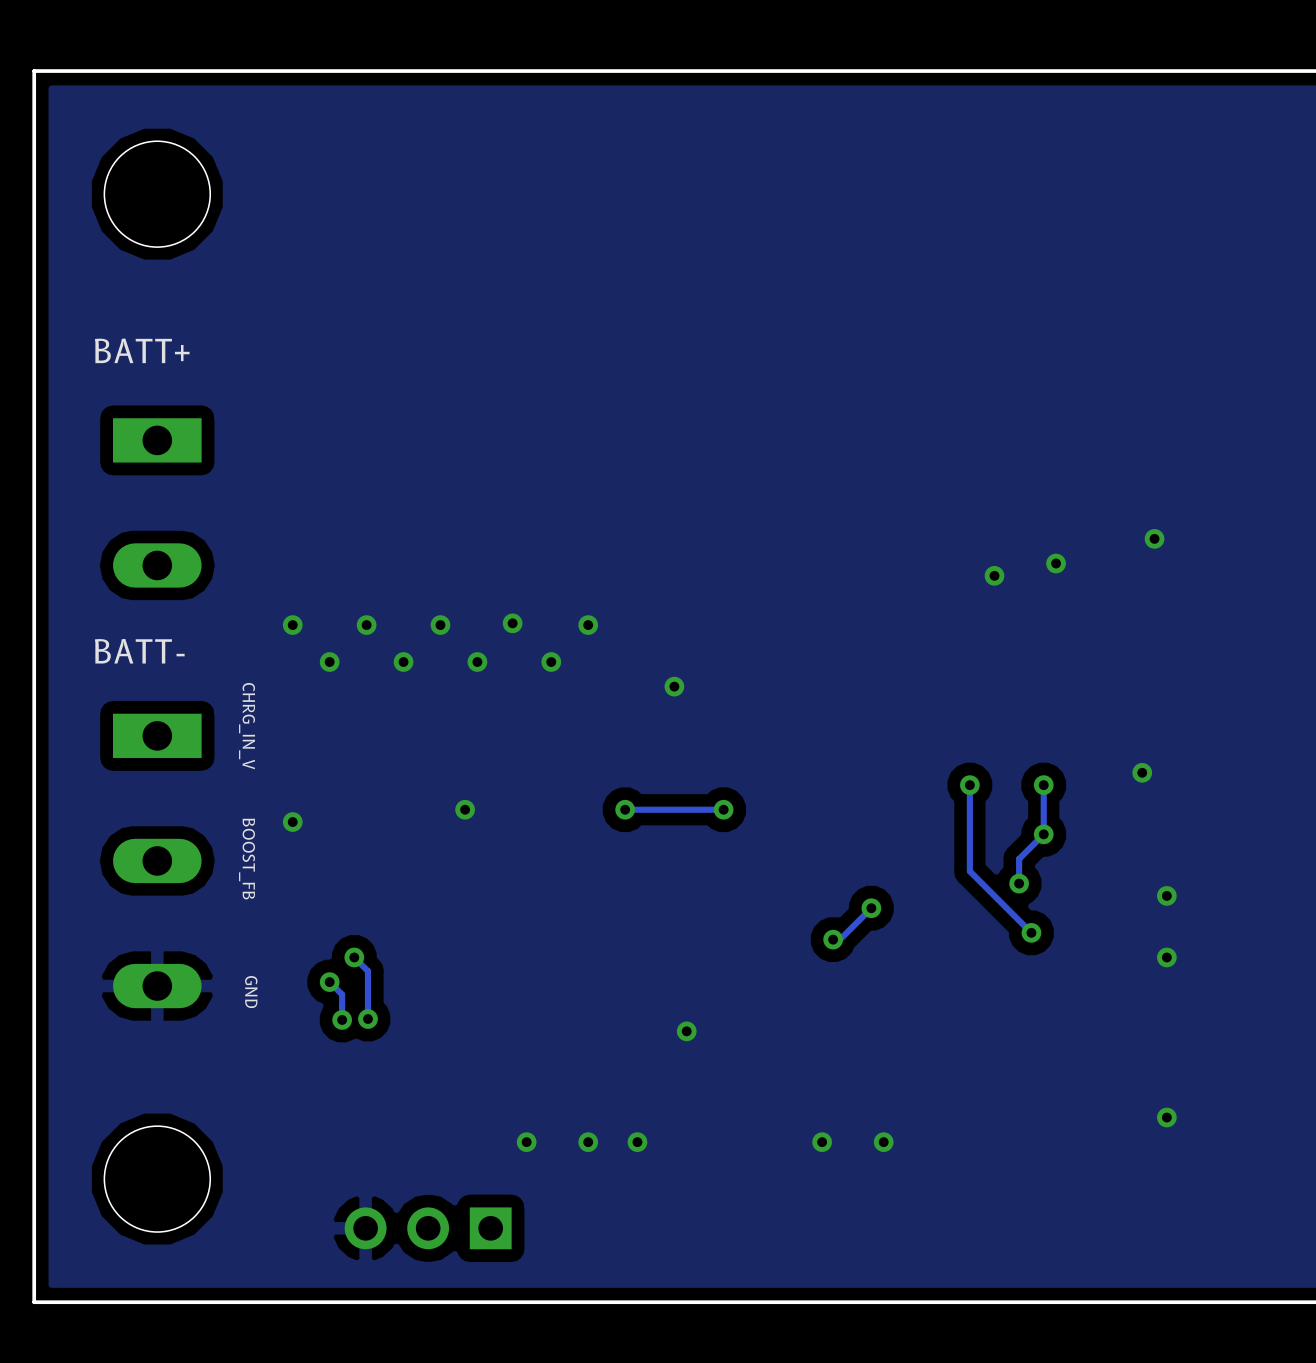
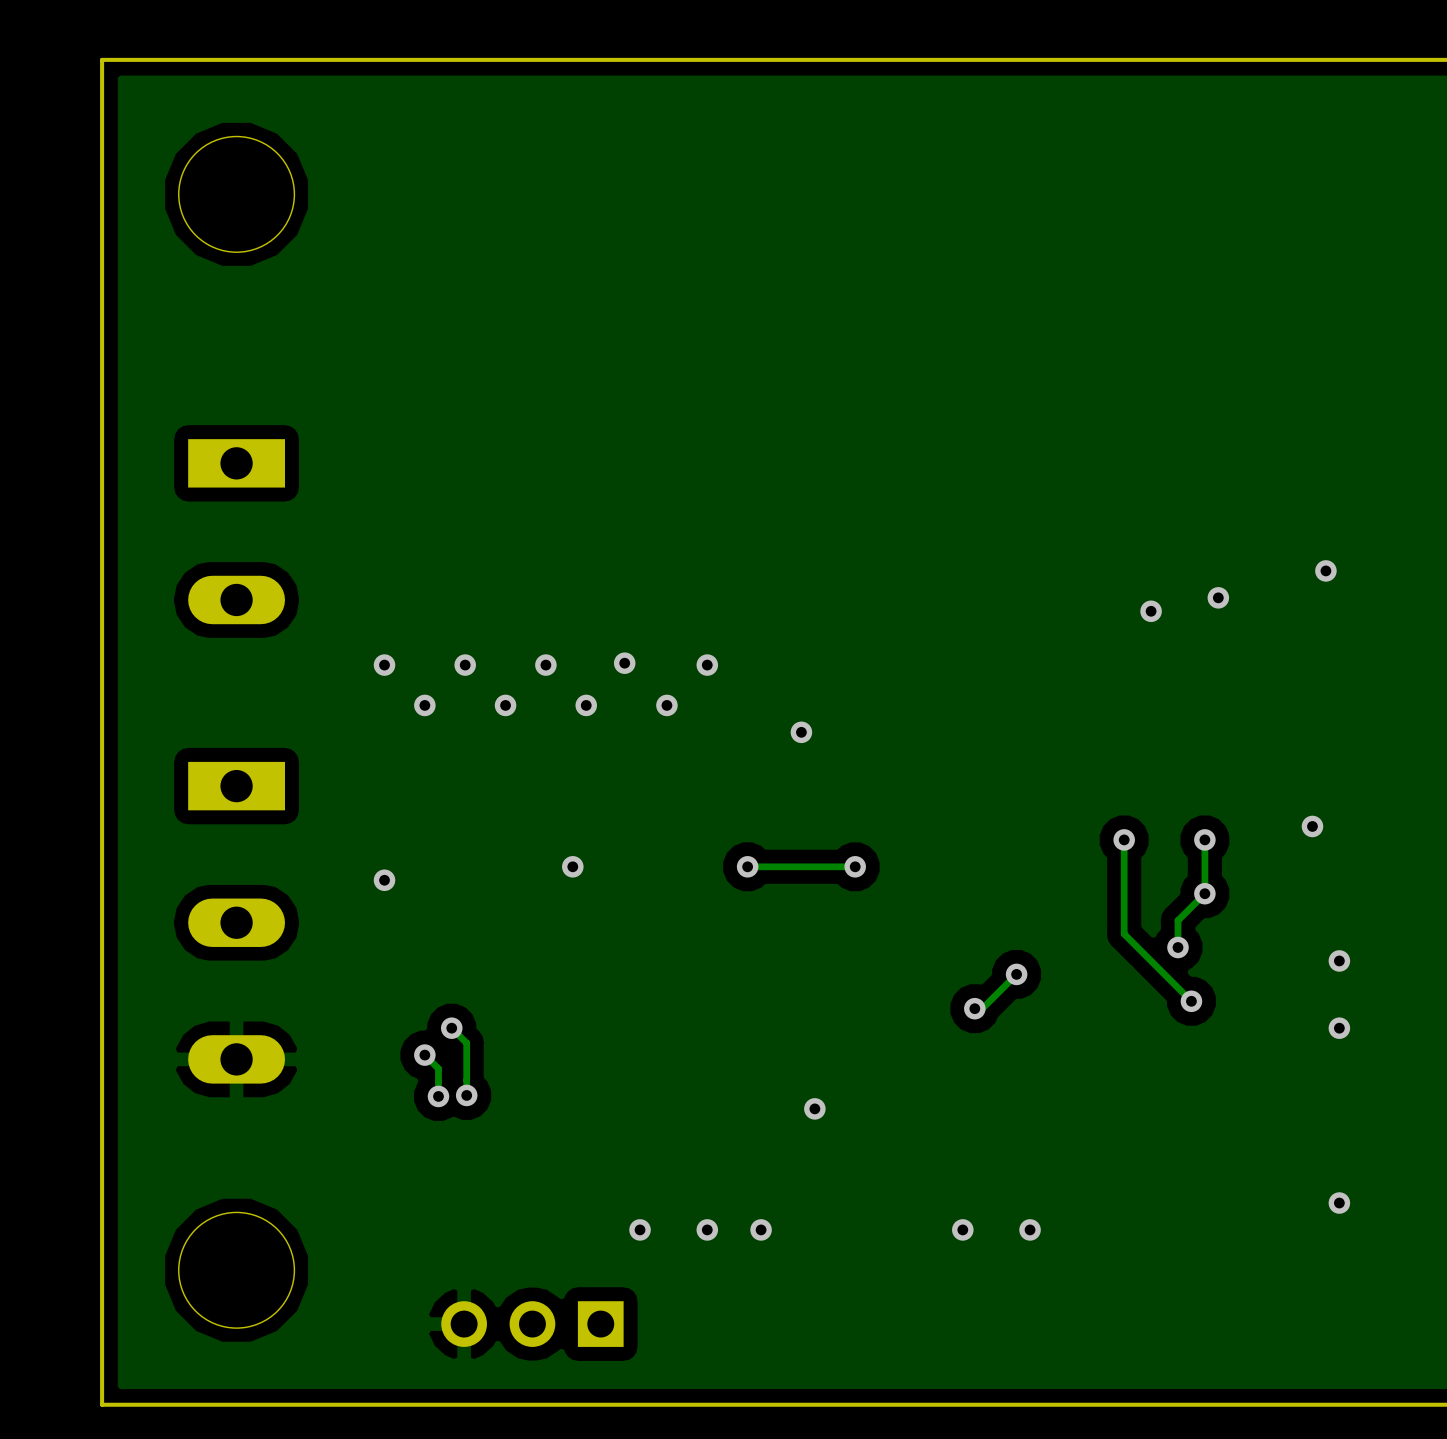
text: BATT+ (142, 350) -> none
text: BATT- (139, 651) -> none
text: CHRG_IN_V (247, 726) -> none
text: BOOST_FB (247, 858) -> none
text: GND (251, 992) -> none

